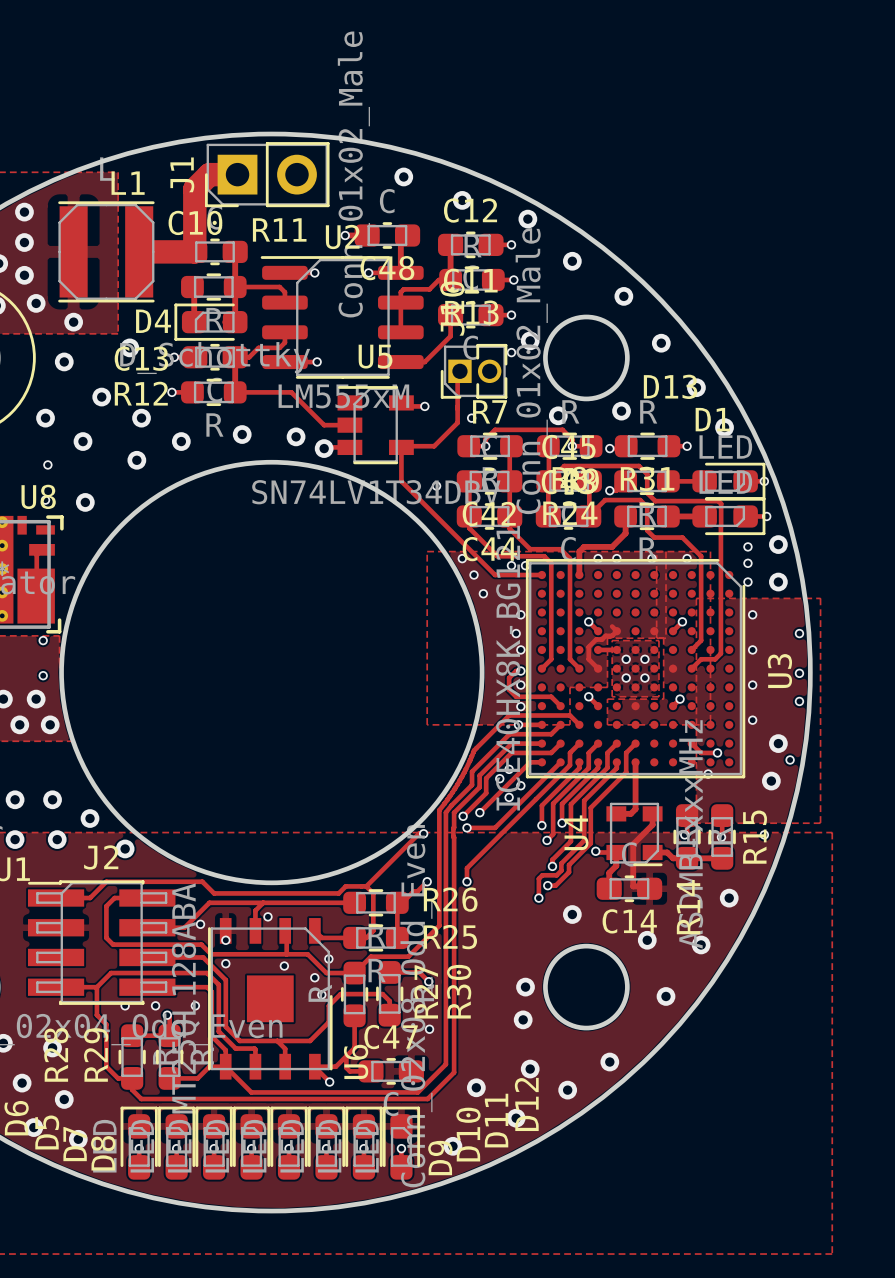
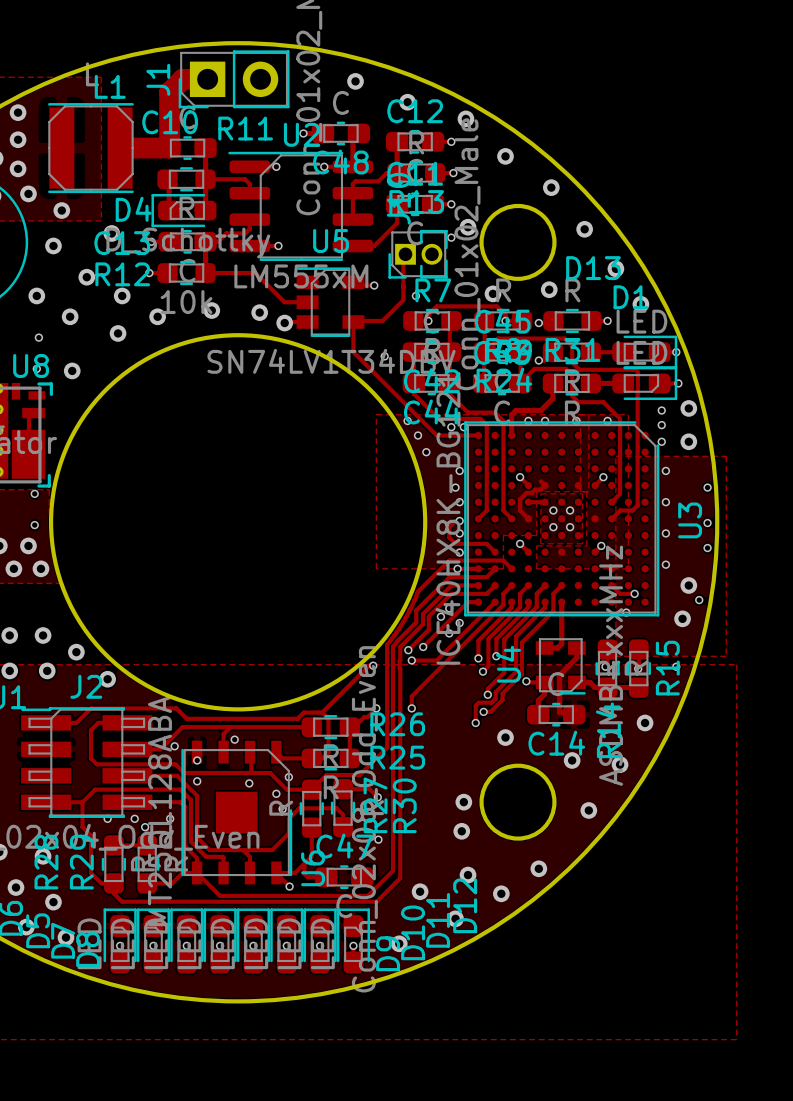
R12 value: R (214, 424) -> 10k (186, 302)

